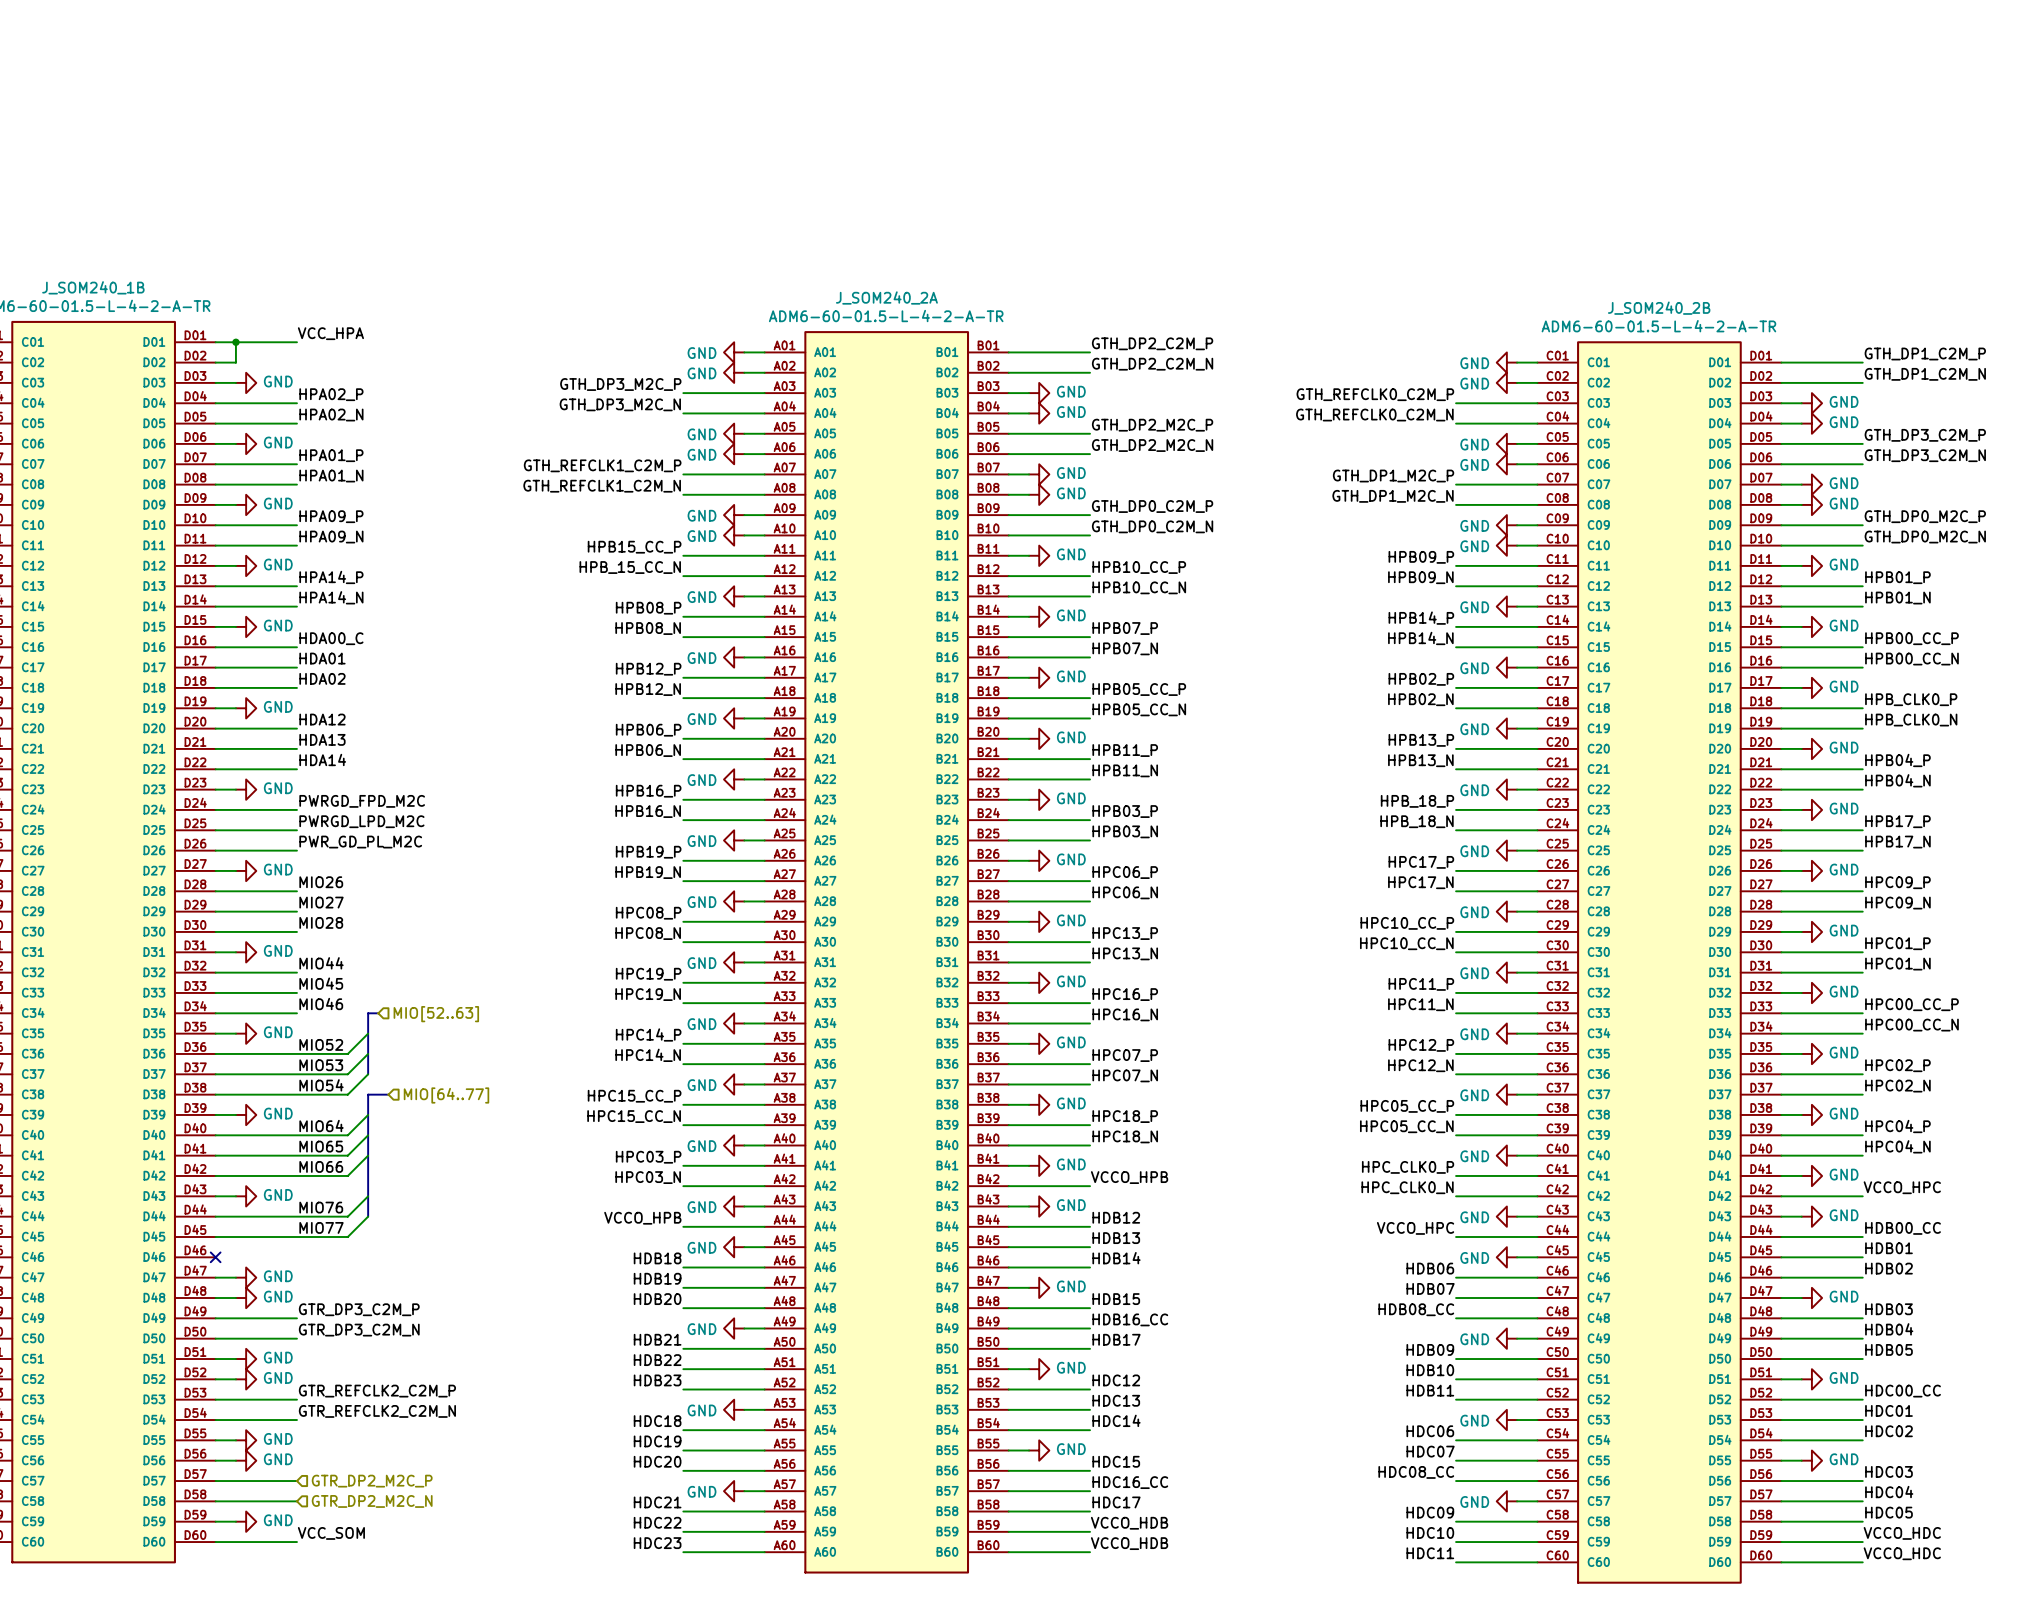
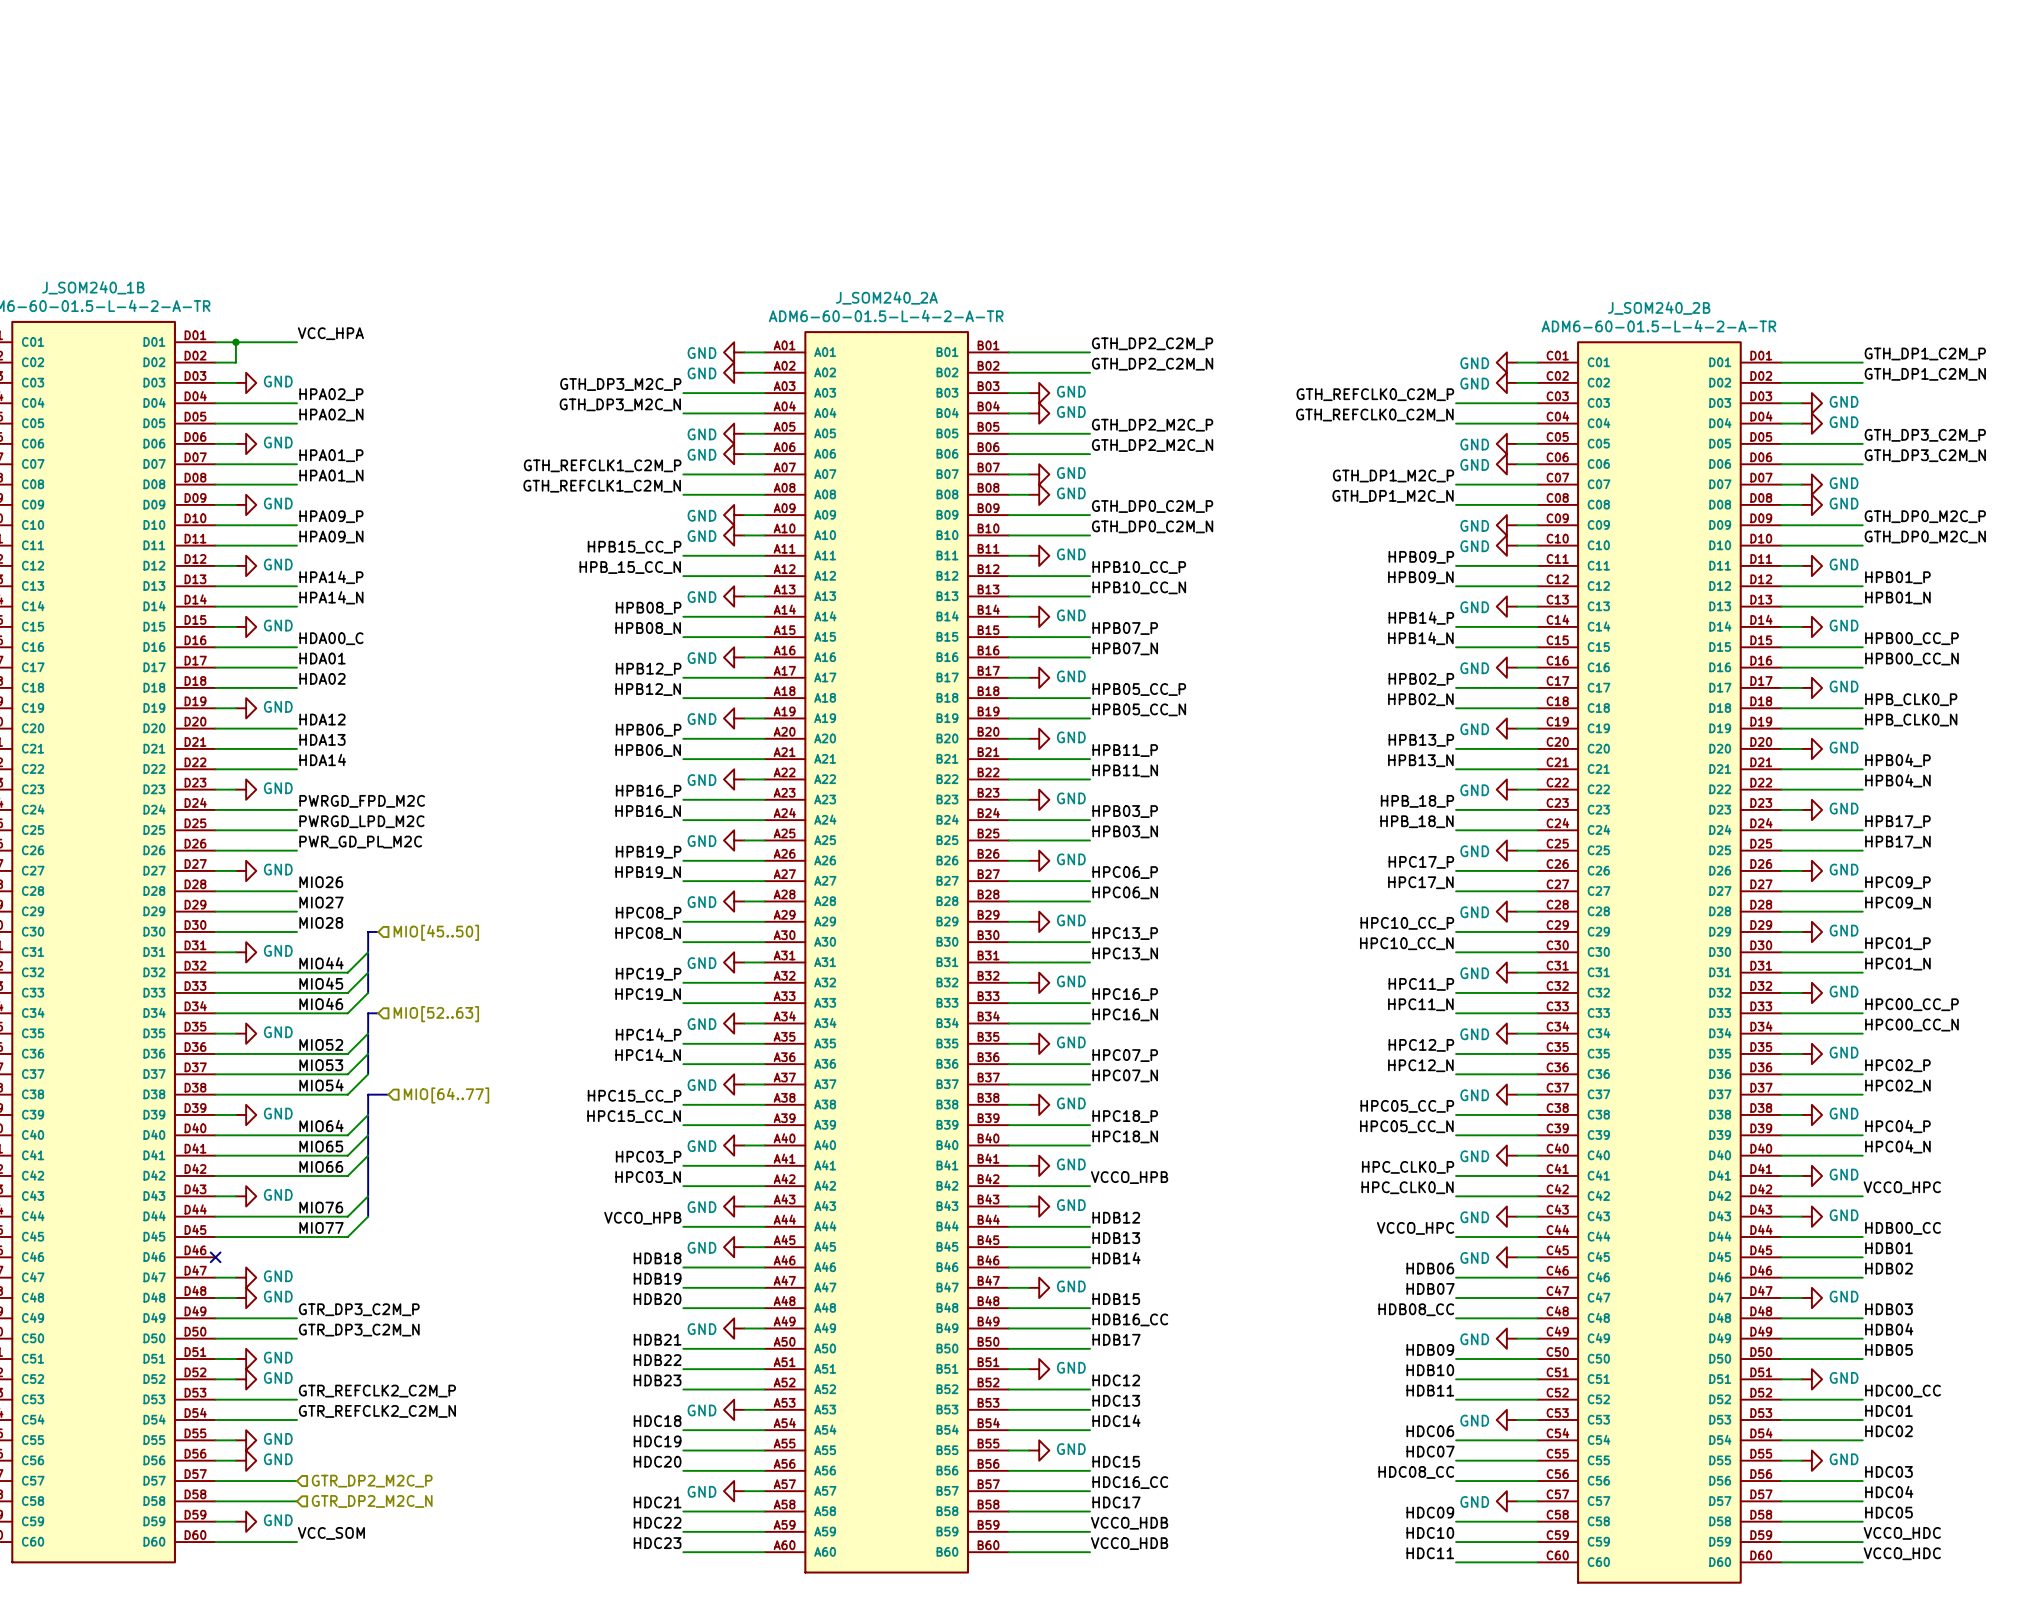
bus: none -> (378, 931) (368, 931) (368, 992)
hierarchical label: none -> MIO[45..50] (436, 932)
wire: none -> (368, 952) (347, 972) (296, 972)
wire: none -> (368, 972) (347, 992) (296, 992)
wire: none -> (368, 992) (347, 1013) (296, 1013)

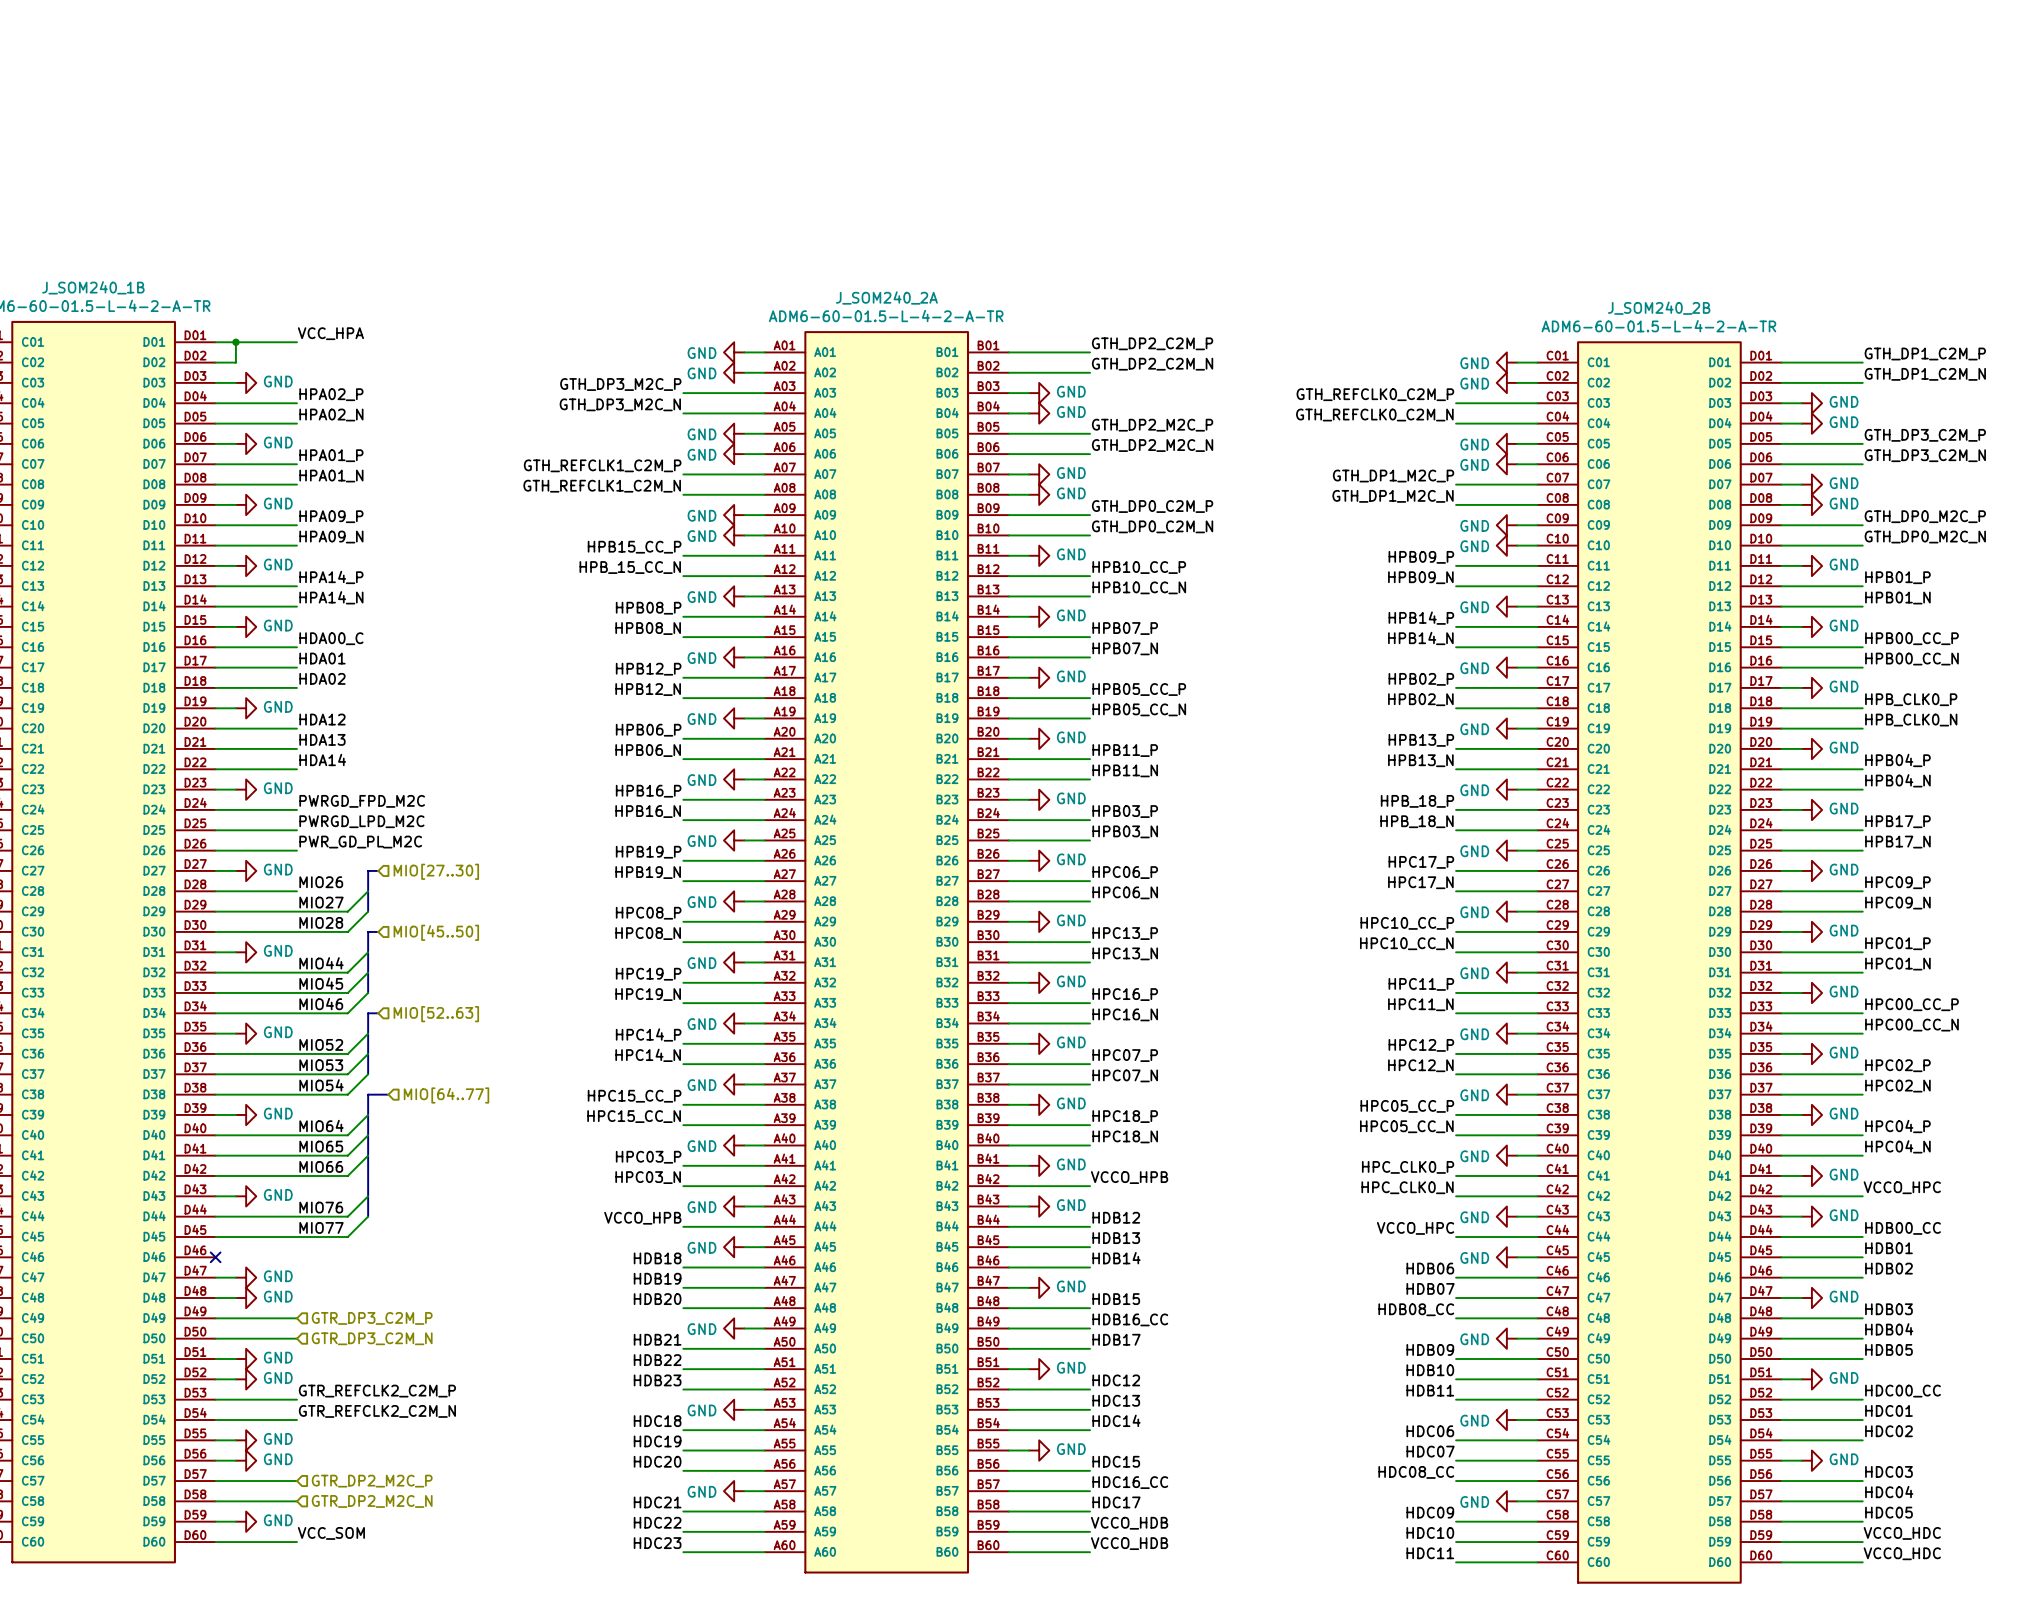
bus: none -> (378, 870) (368, 870) (368, 911)
hierarchical label: none -> MIO[27..30] (436, 871)
wire: none -> (368, 891) (347, 911) (296, 911)
wire: none -> (368, 911) (347, 931) (296, 931)
label: GTR_DP3_C2M_P (359, 1309) -> none
hierarchical label: none -> GTR_DP3_C2M_P (372, 1318)
label: GTR_DP3_C2M_N (359, 1330) -> none
hierarchical label: none -> GTR_DP3_C2M_N (372, 1338)

